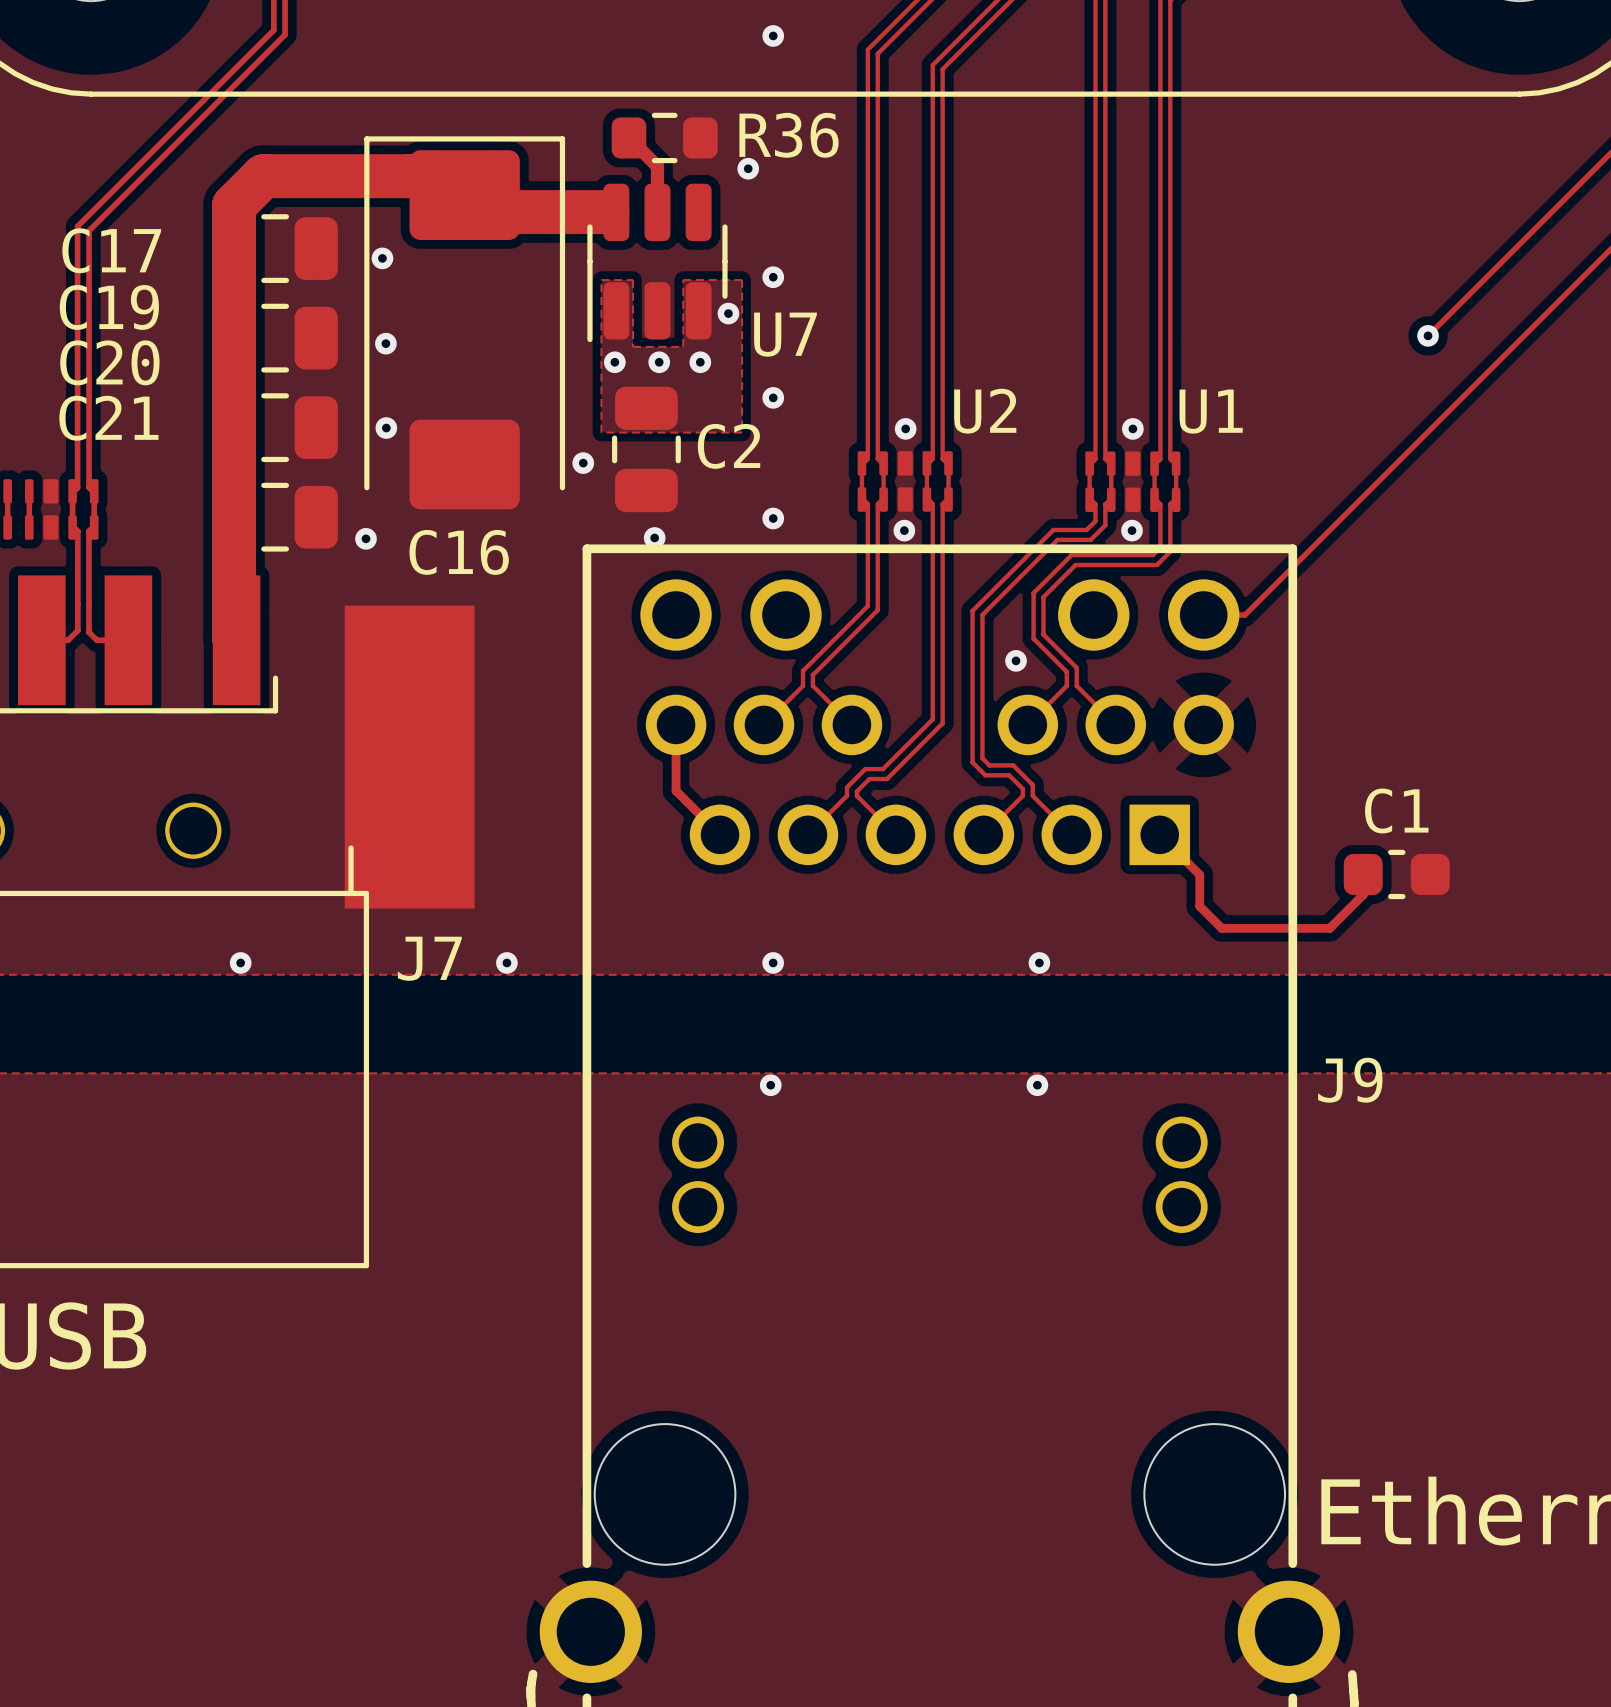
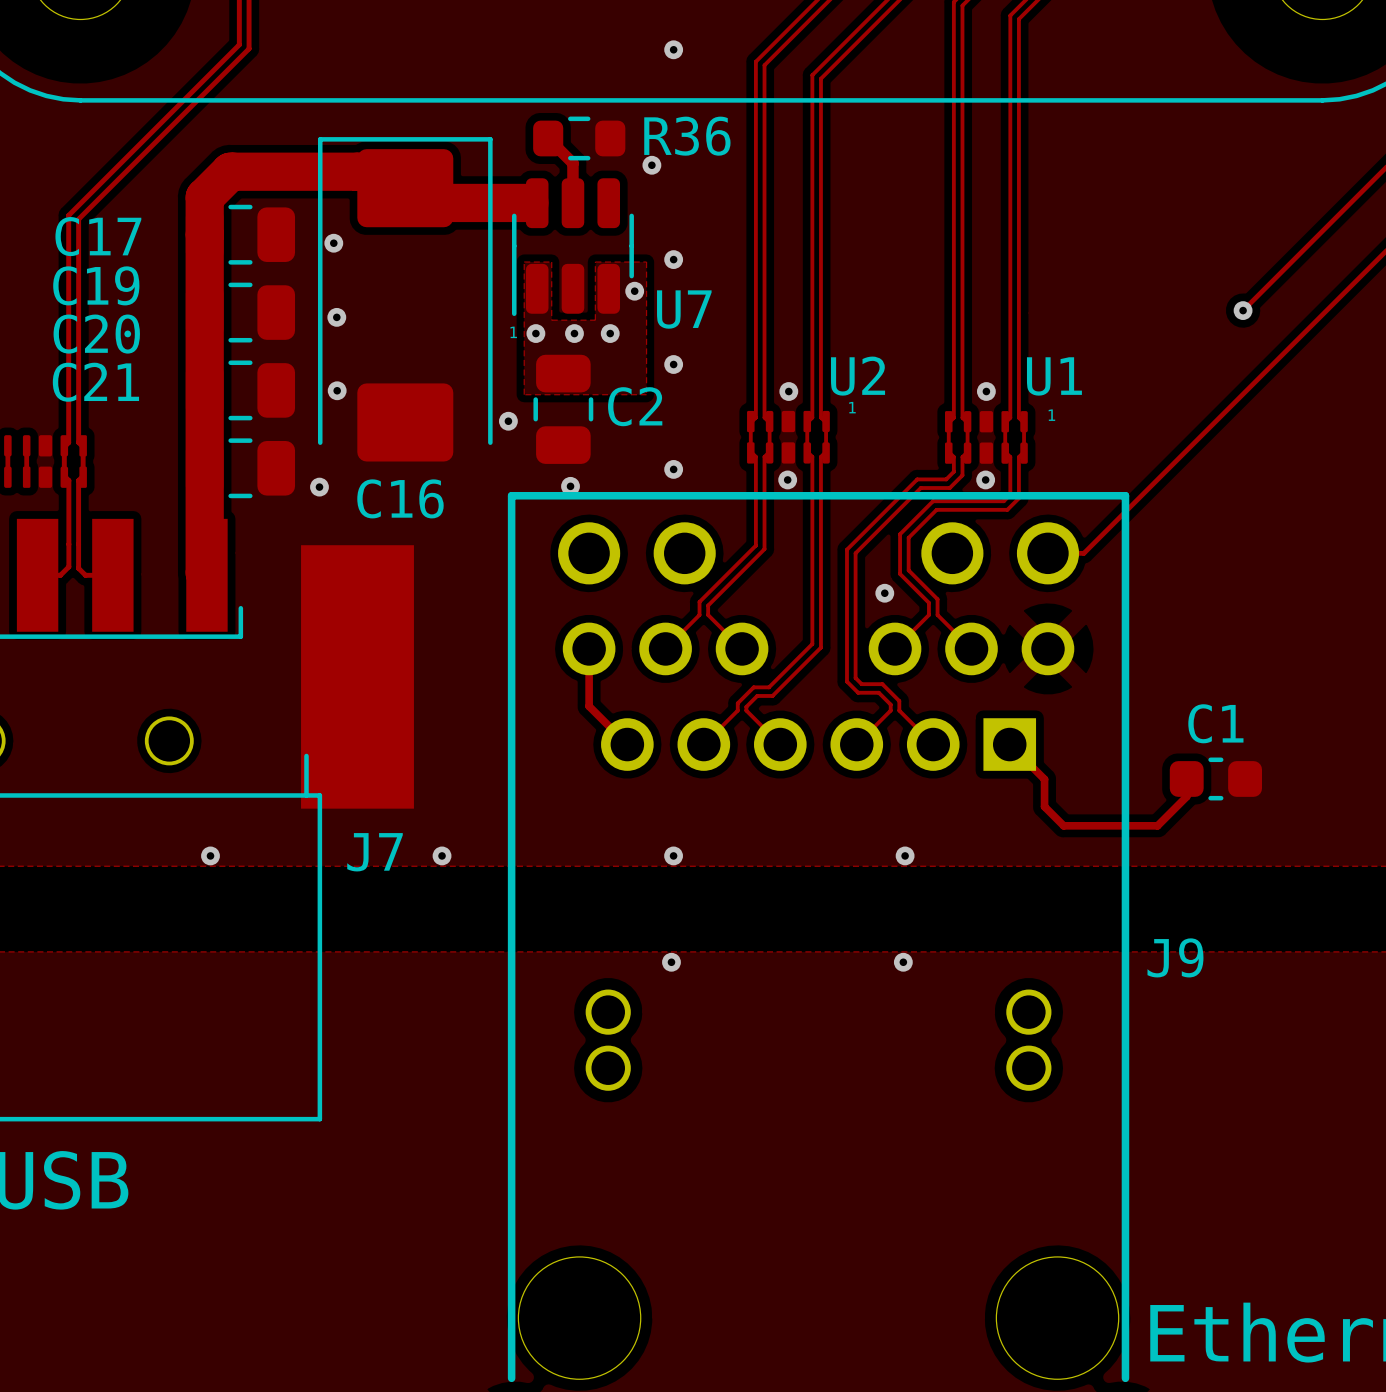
text: none -> 1 (513, 332)
text: none -> 1 (852, 407)
text: none -> 1 (1051, 415)

